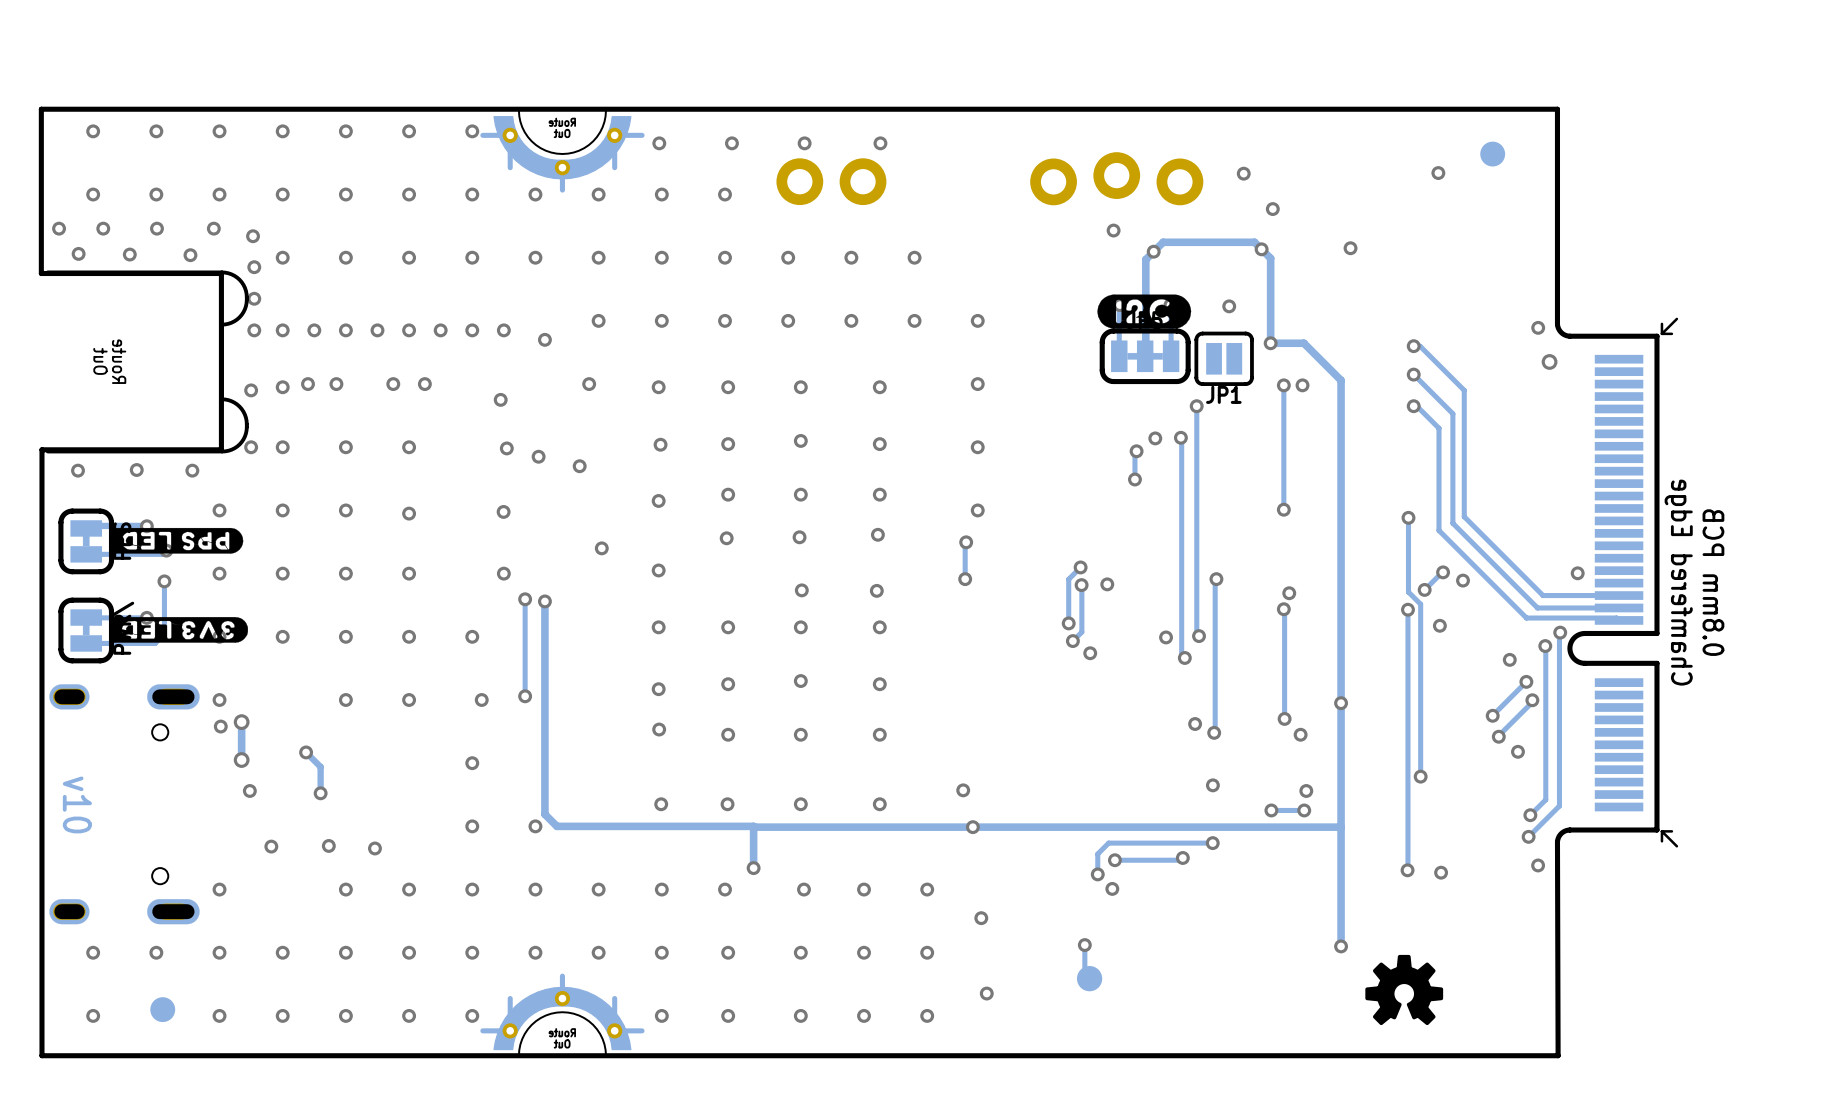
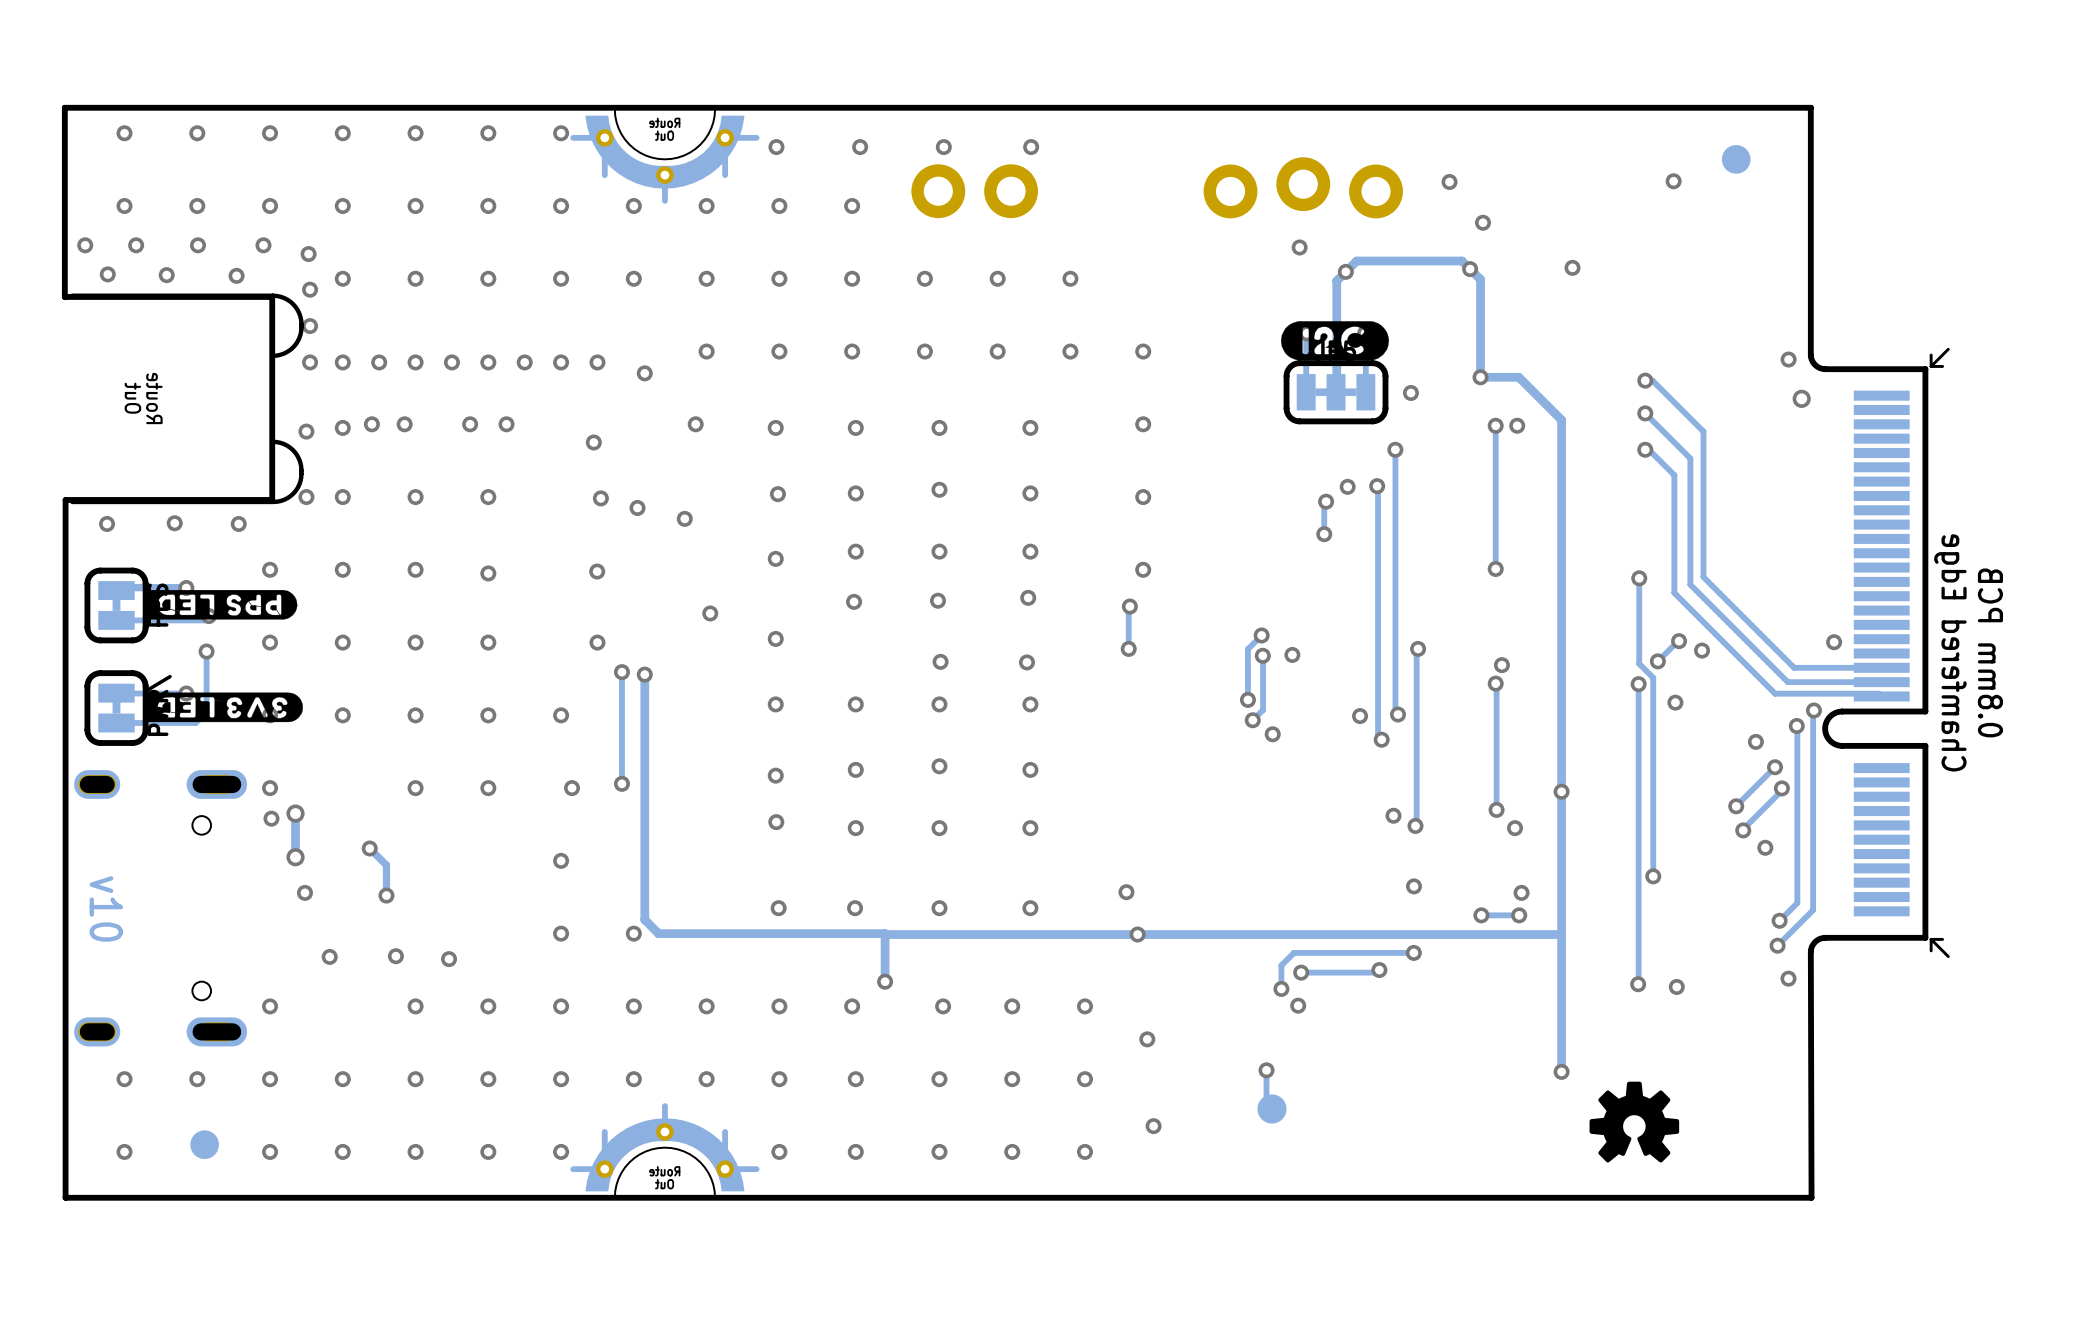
via position: (1229, 306) -> (1410, 393)
JP1: (1224, 358) -> none

